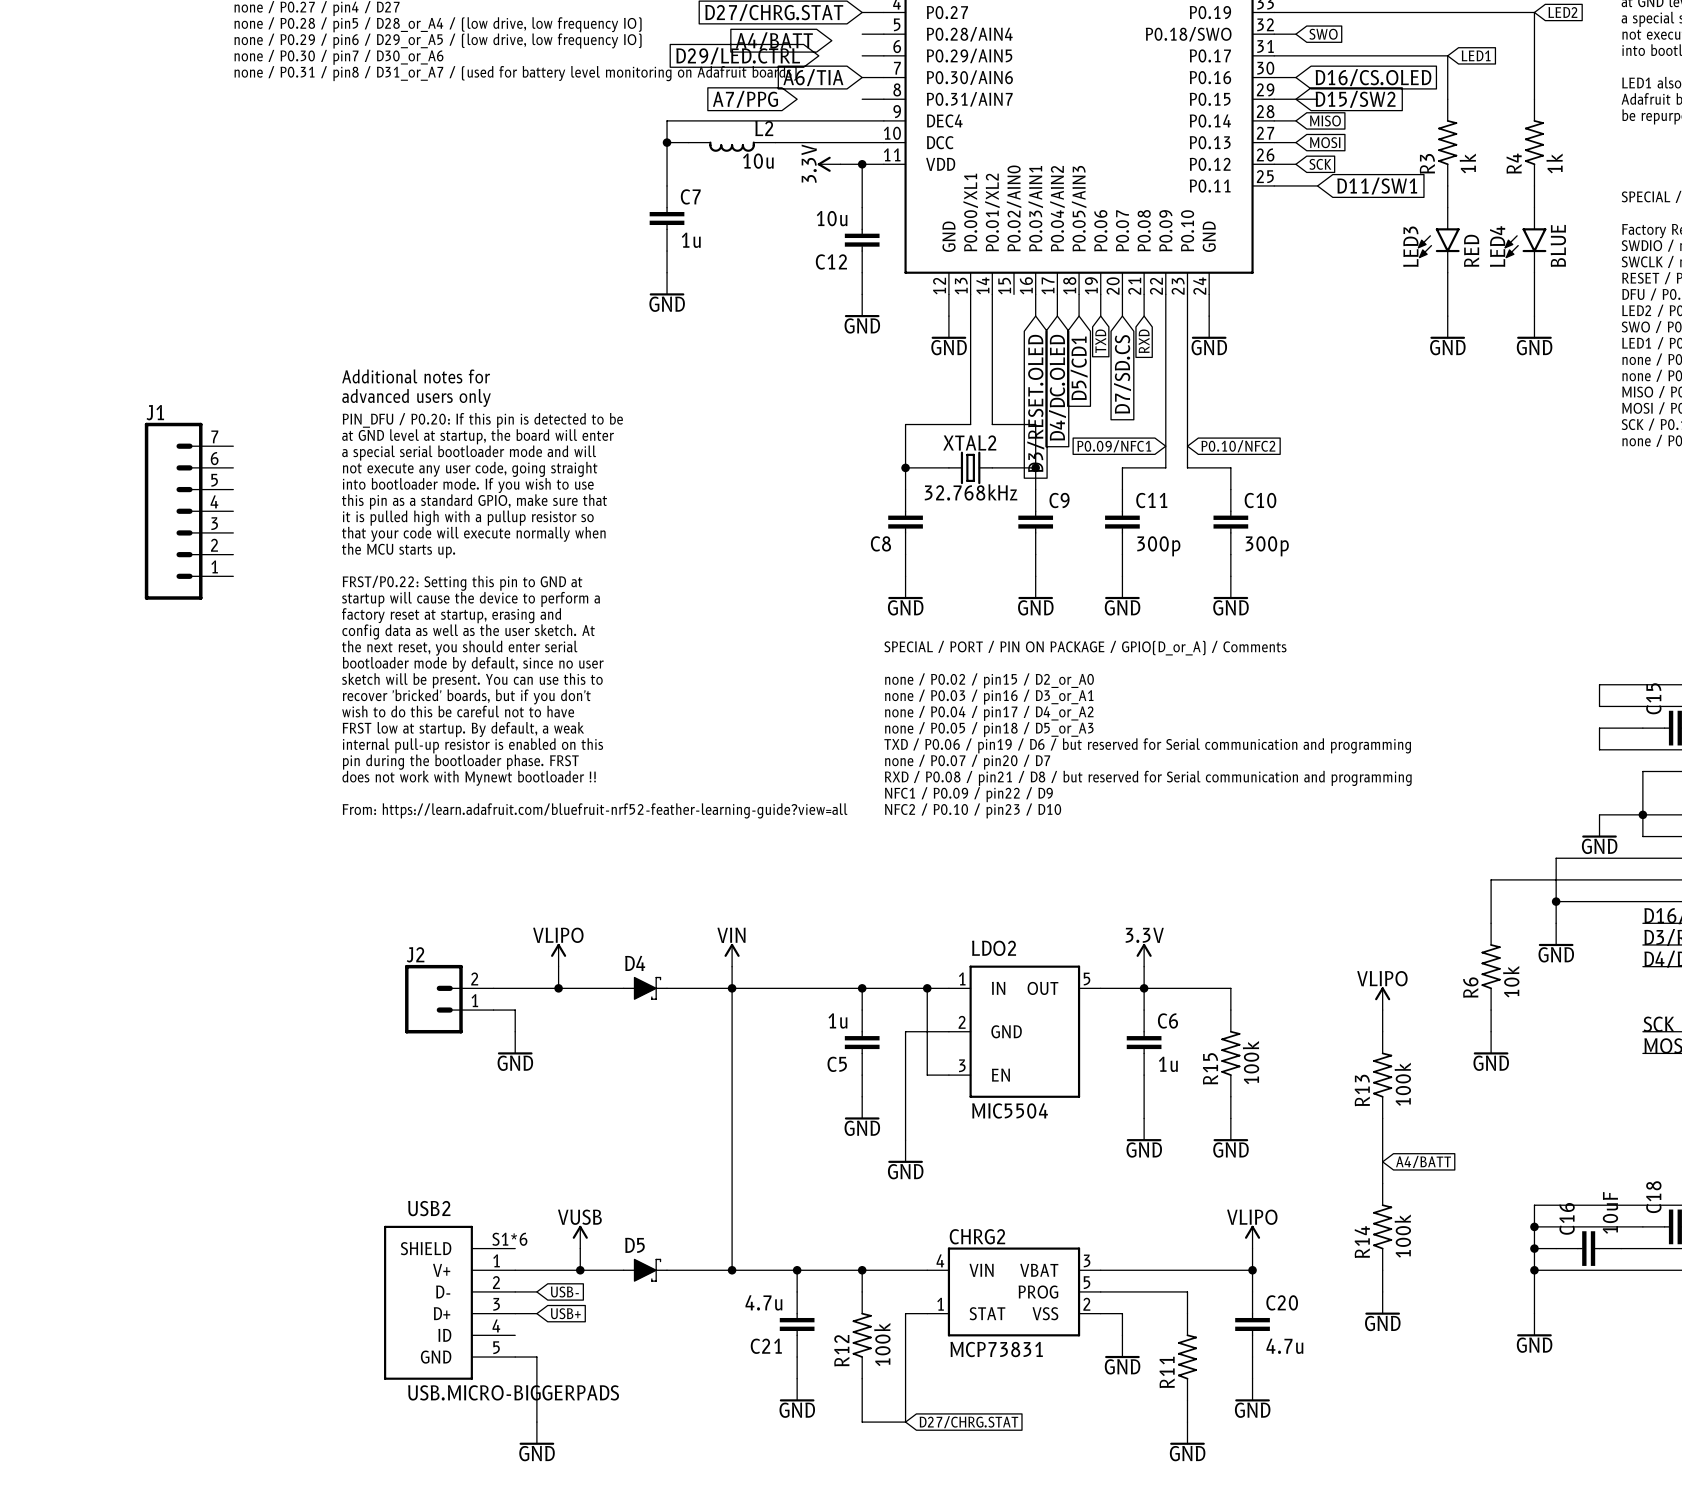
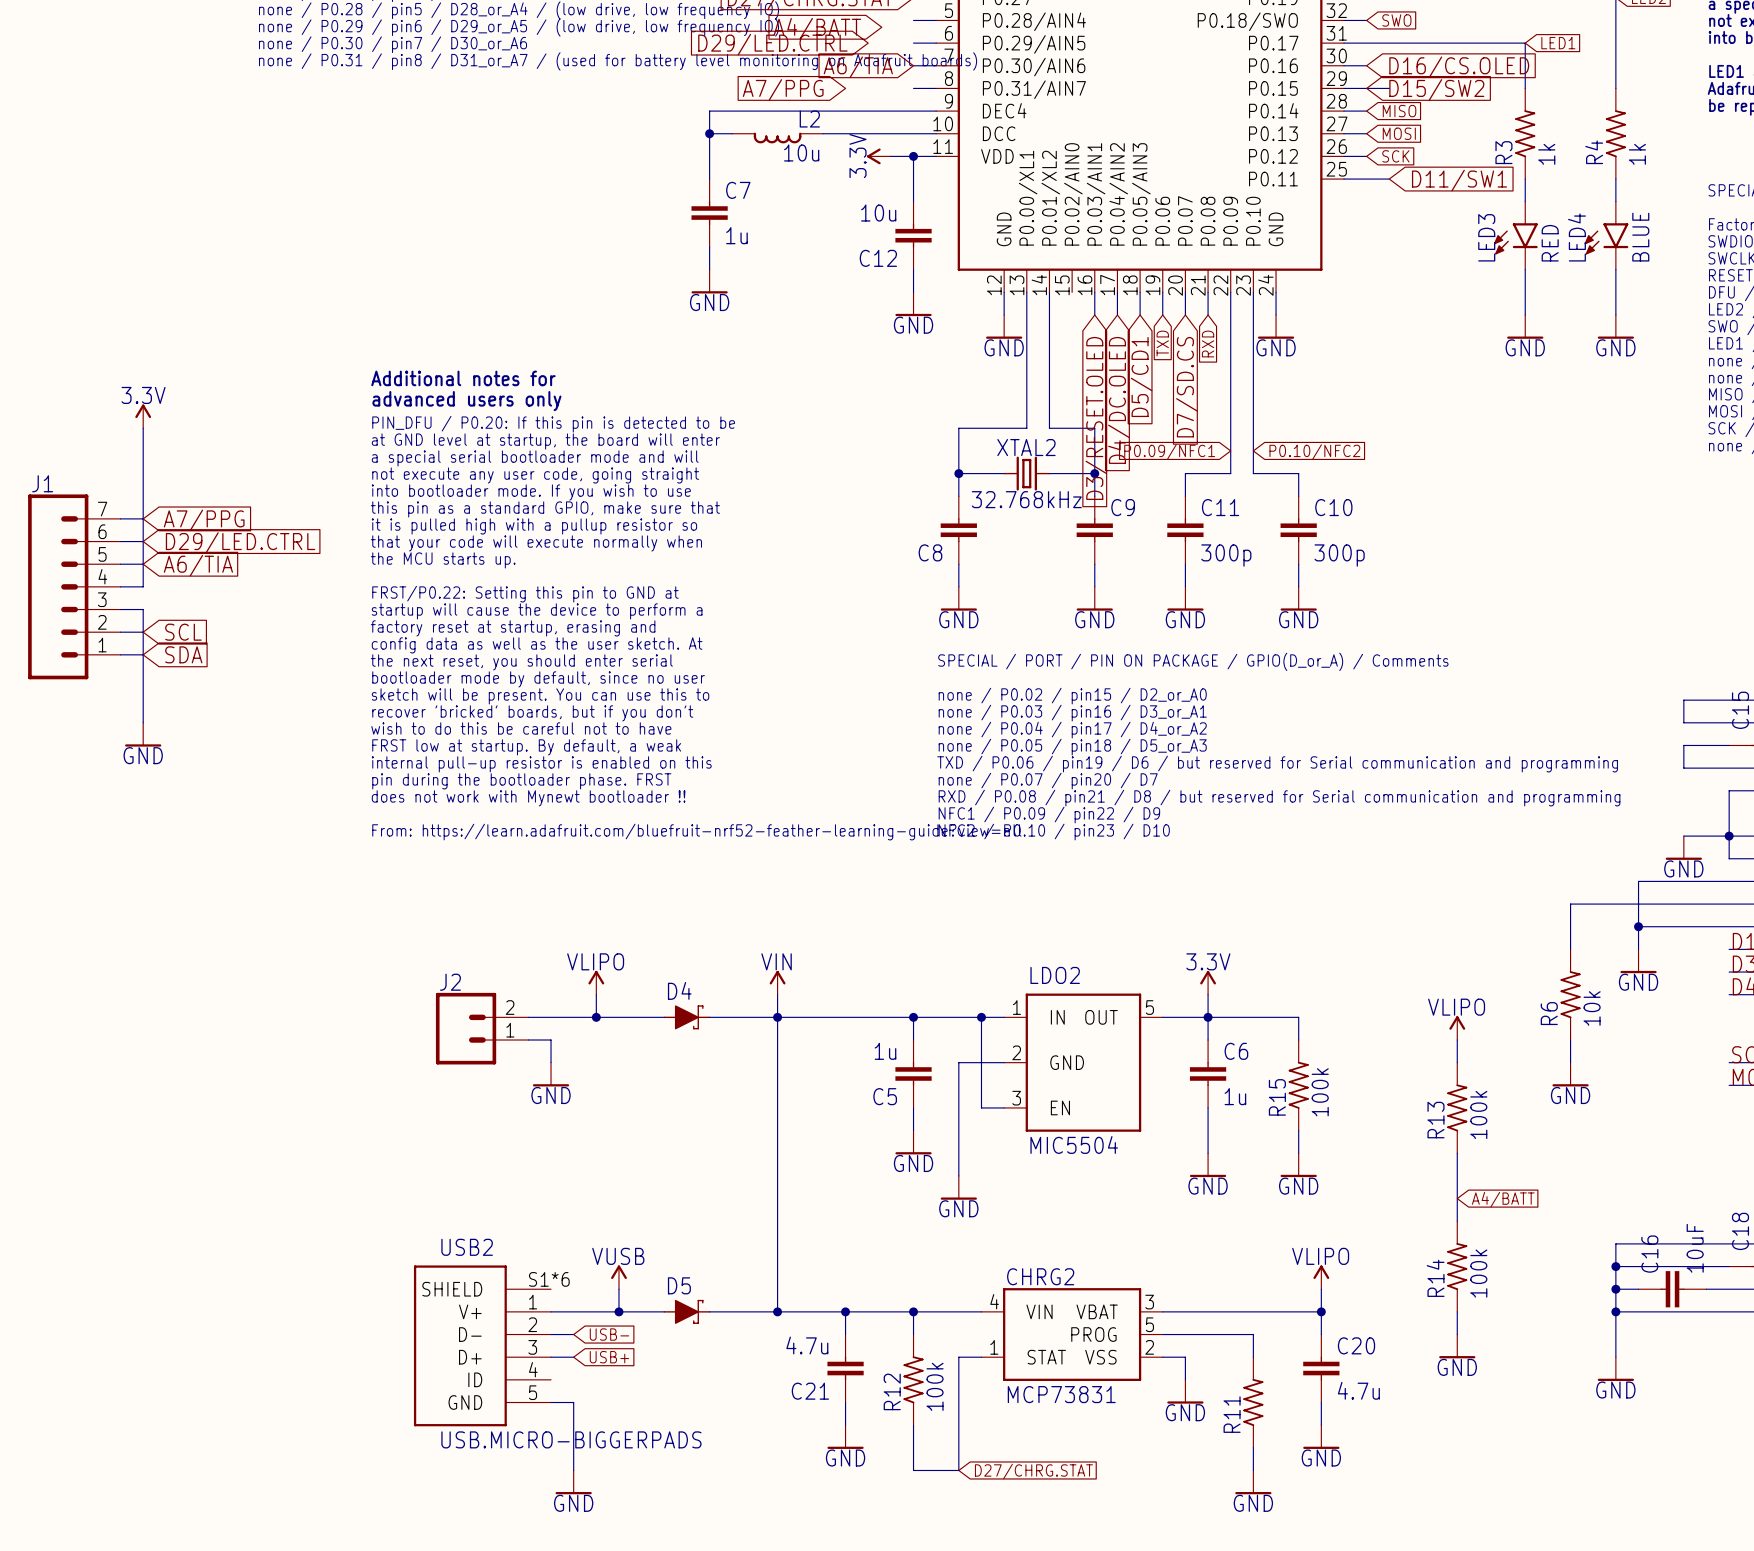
power symbol: none -> 3.3V (143, 416)
wire: none -> (143, 428) (143, 586) (120, 586)
wire: none -> (120, 518) (143, 518)
global label: none -> A7/PPG (204, 520)
J1 position: (189, 511) -> (74, 586)
wire: none -> (120, 541) (143, 541)
global label: none -> D29/LED.CTRL (240, 543)
wire: none -> (120, 564) (143, 564)
global label: none -> A6/TIA (198, 565)
wire: none -> (120, 609) (143, 609) (143, 722)
wire: none -> (120, 632) (143, 632)
global label: none -> SCL (183, 632)
wire: none -> (120, 654) (143, 654)
global label: none -> SDA (183, 654)
power symbol: none -> GND (143, 734)

